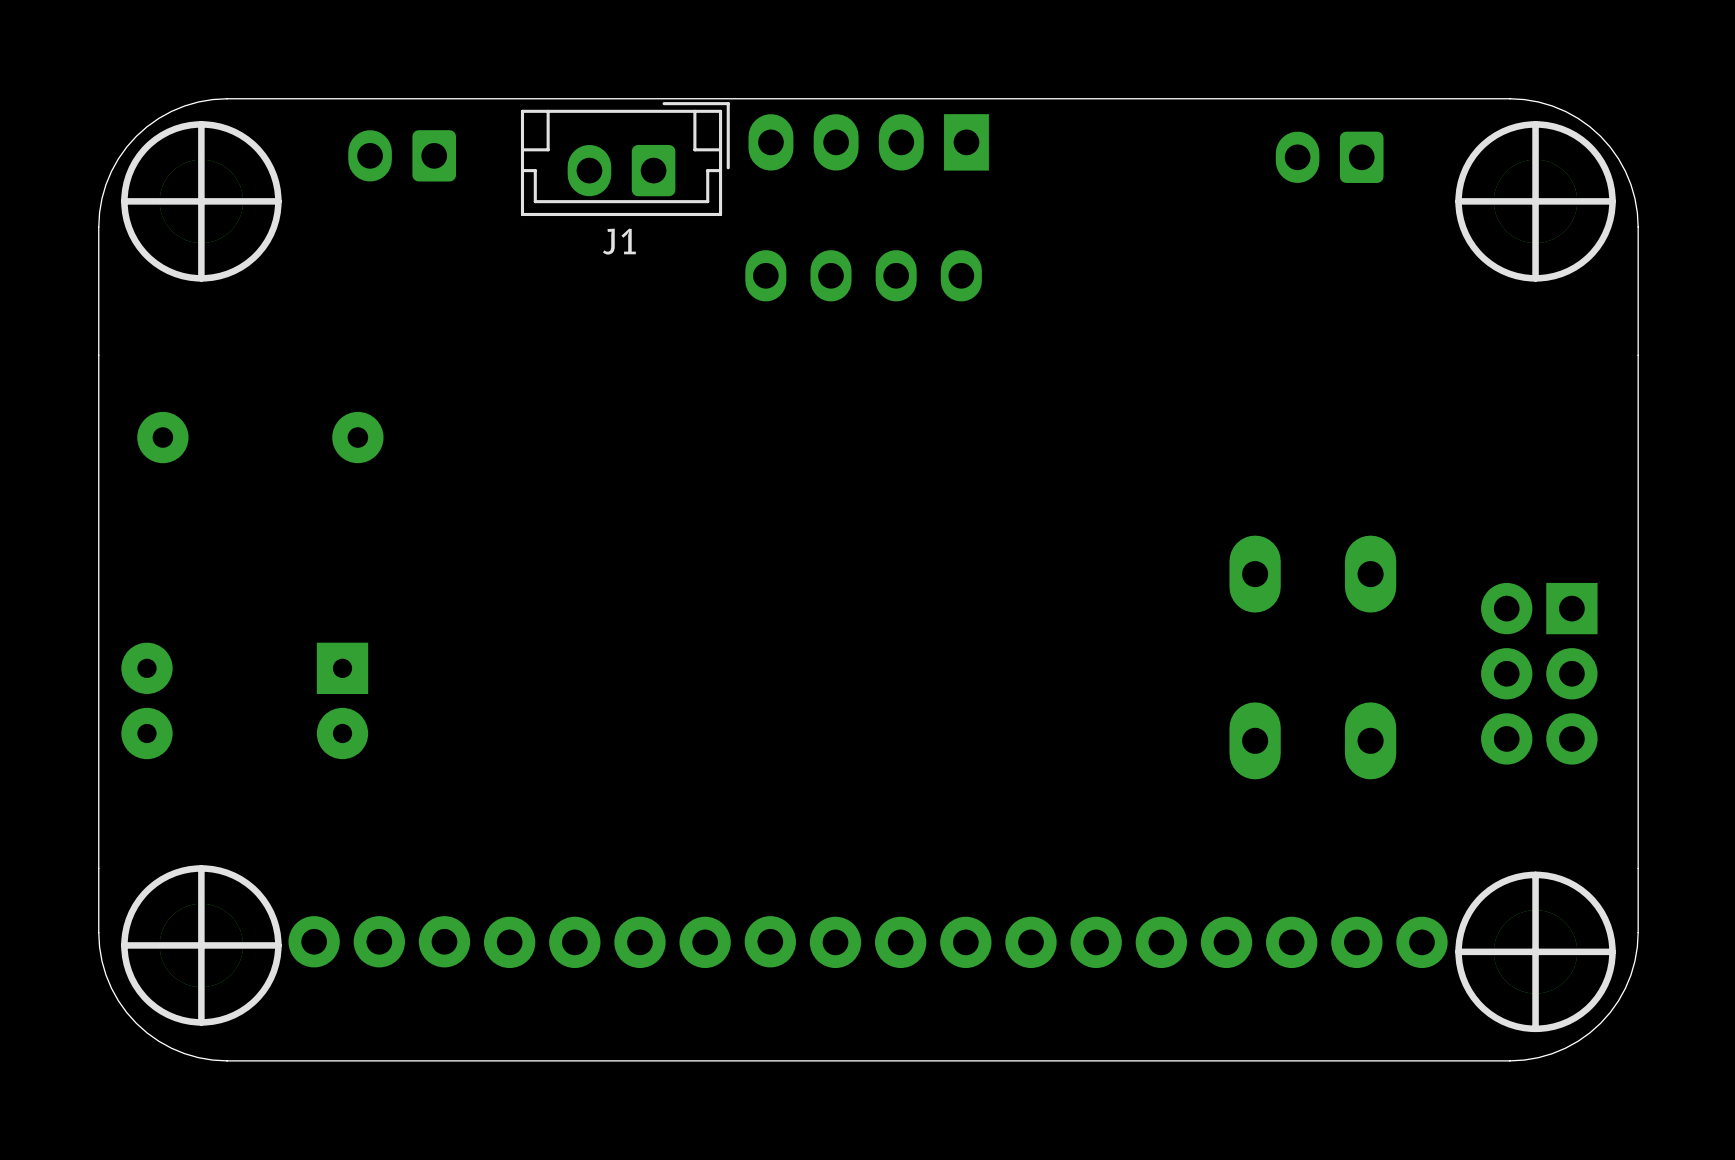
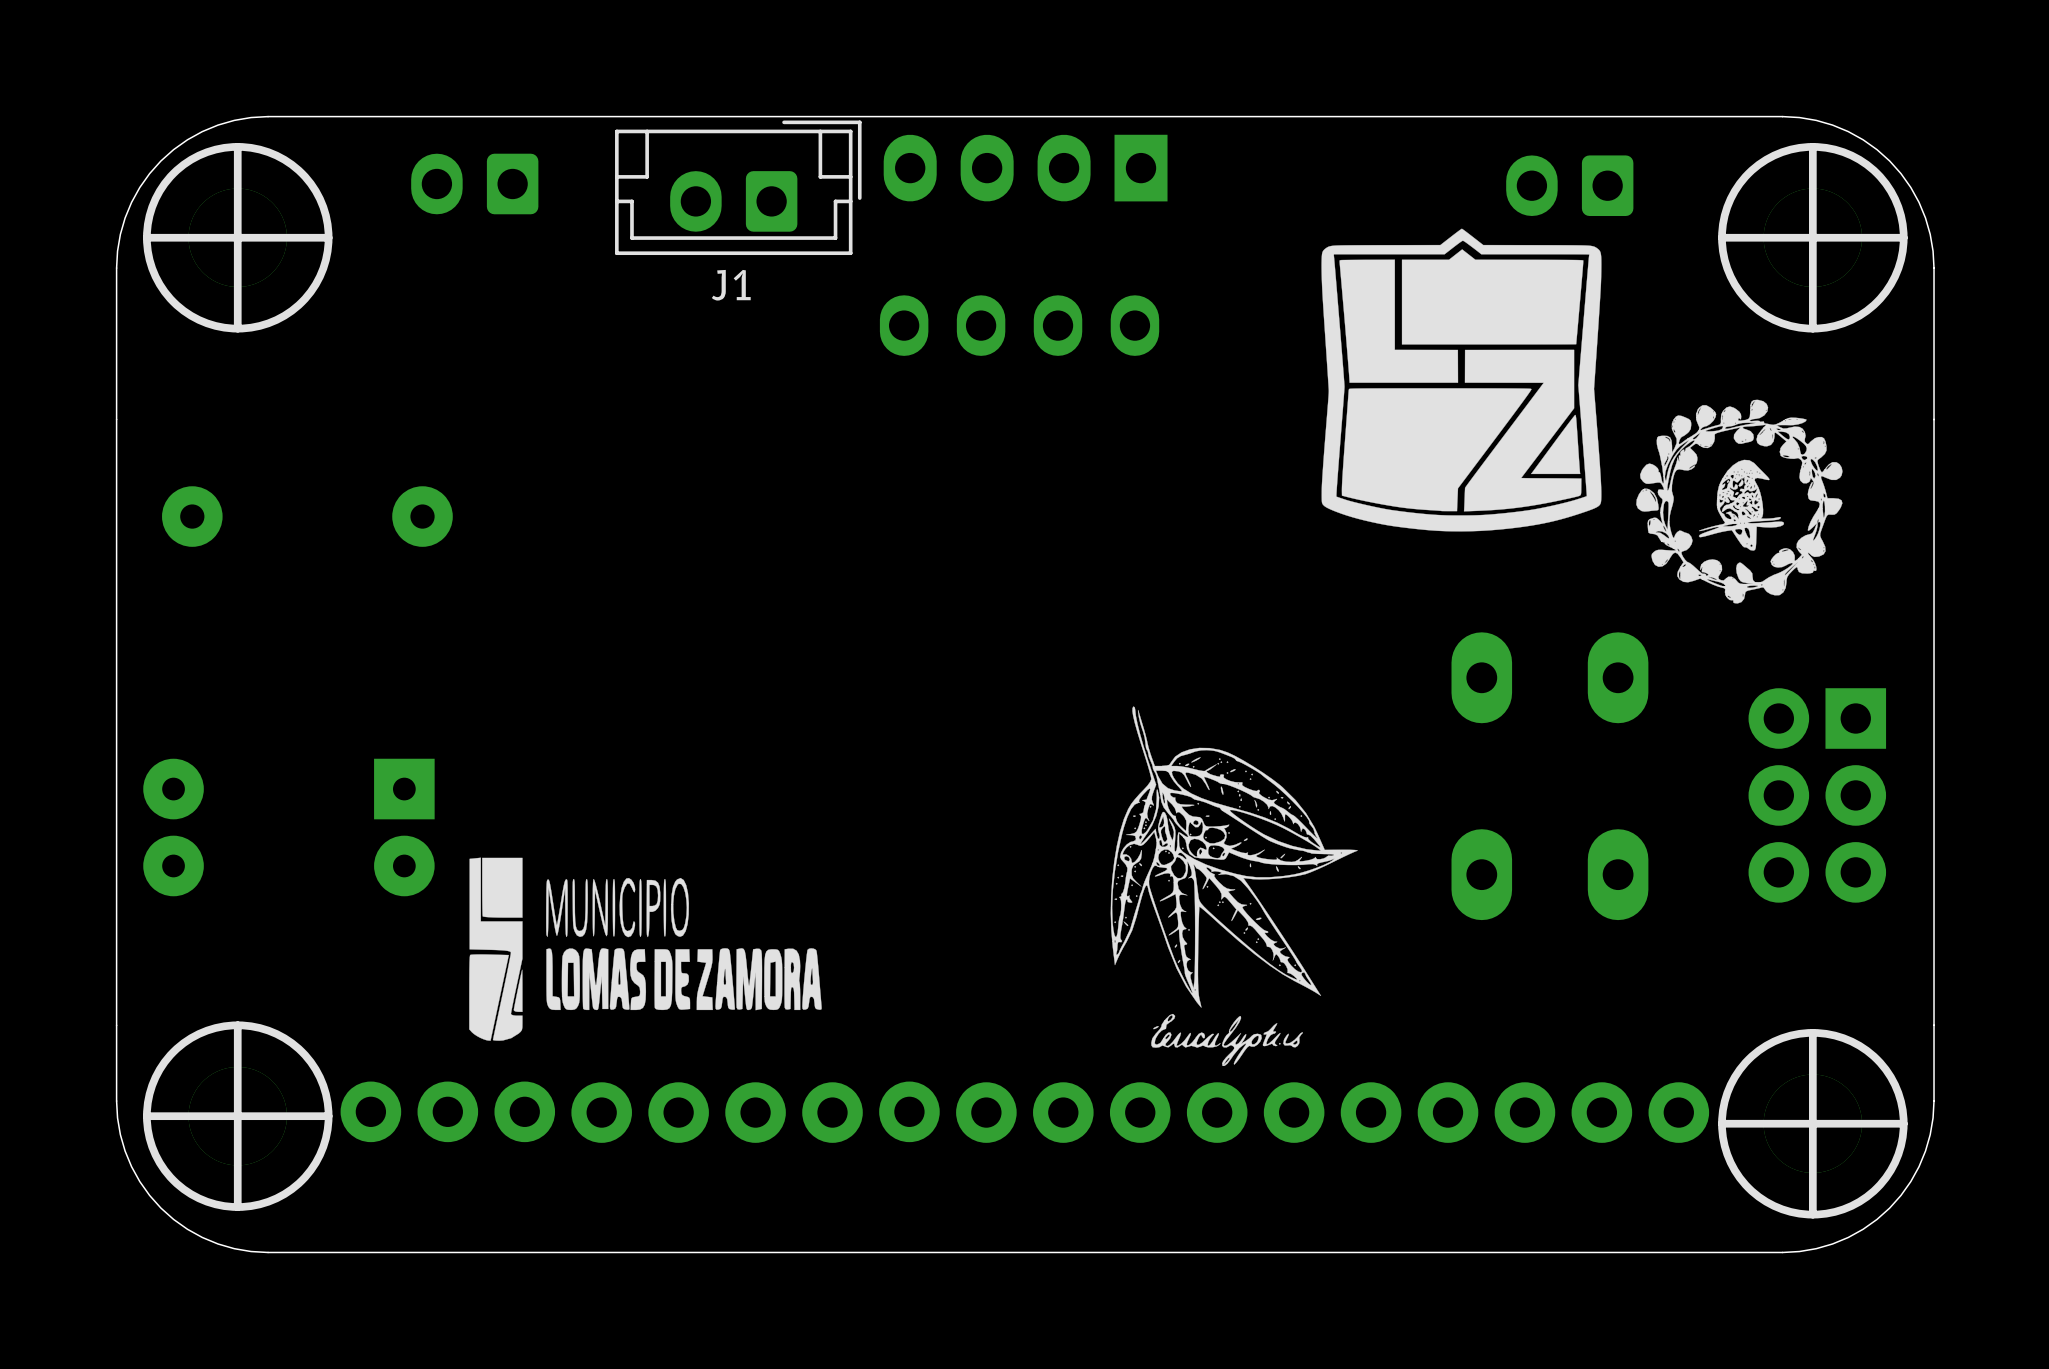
drawing: none -> [1321, 228, 1843, 604]
drawing: none -> [1110, 706, 1358, 1066]
drawing: none -> [469, 857, 822, 1041]

